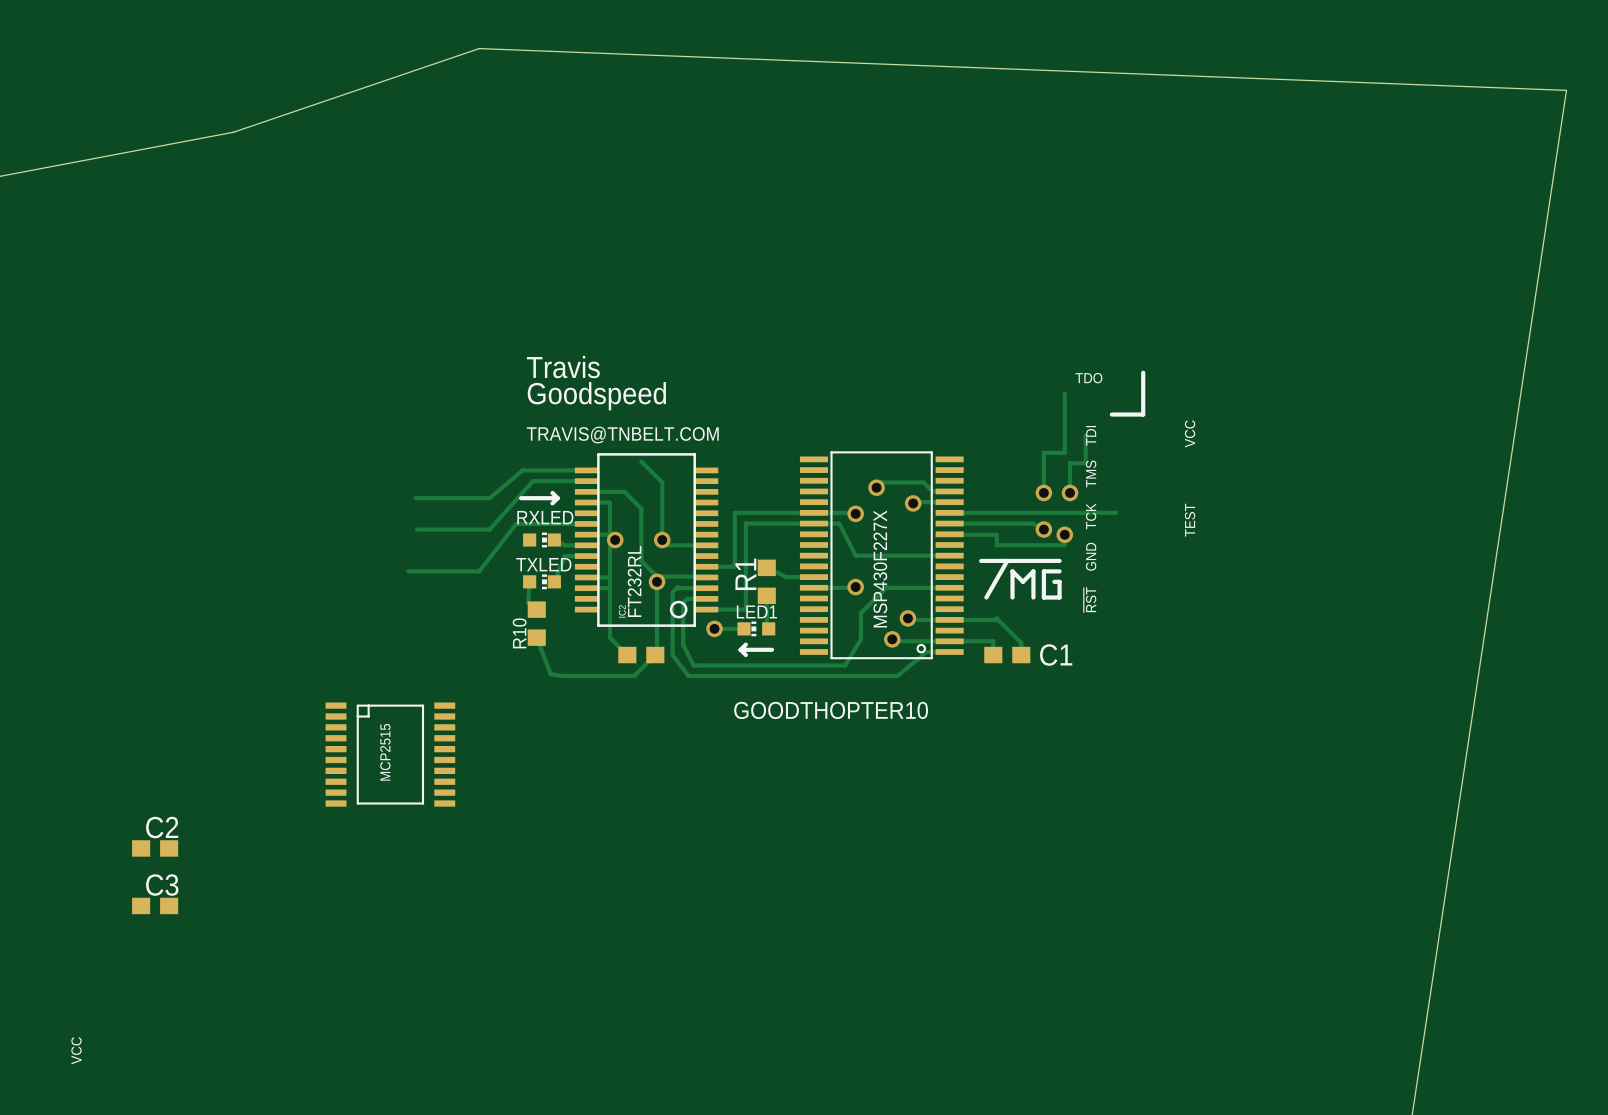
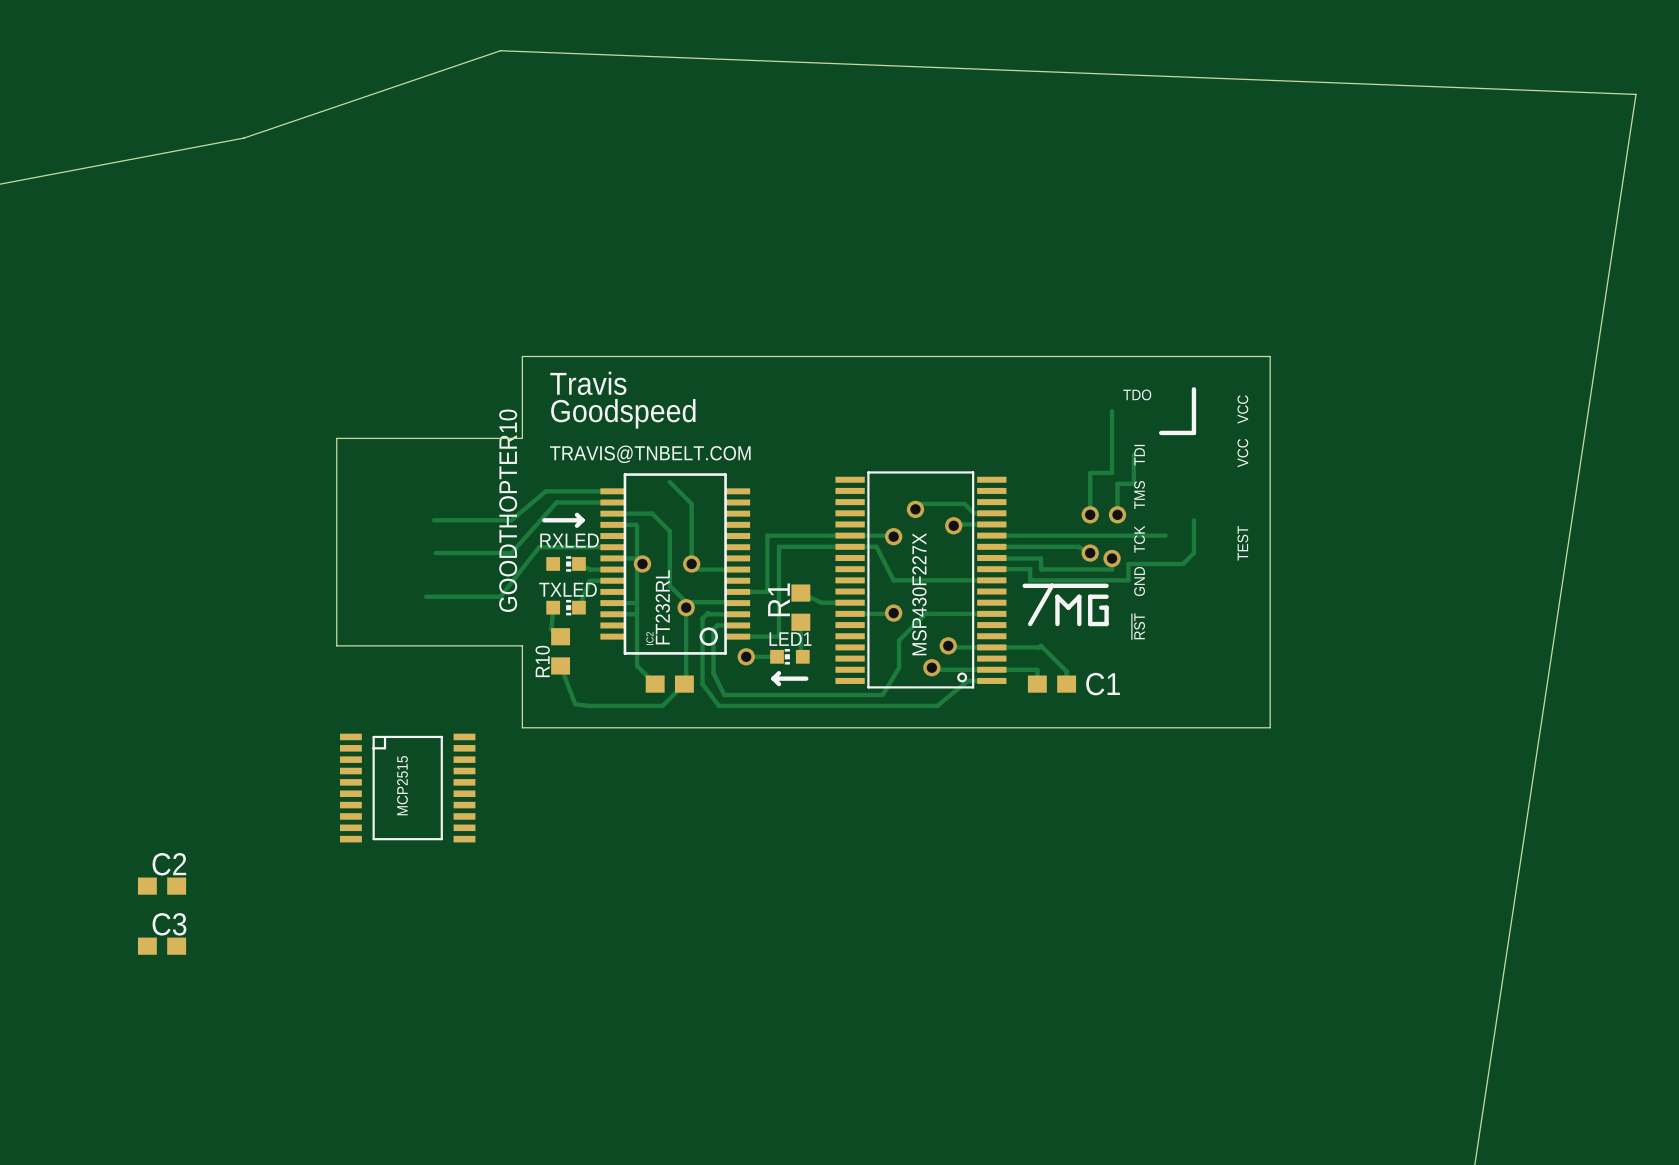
board edge: none -> (522, 356) (1270, 356) (1270, 727) (522, 727) (522, 645) (336, 645) (336, 438) (522, 438) (522, 356)
text: none -> VCC (1242, 409)
text: none -> GOODTHOPTER10 (508, 510)
track: none -> (1193, 520) (1193, 553) (1183, 563) (1128, 563) (1128, 580) (1030, 580) (1030, 569) (991, 569)
text: GOODTHOPTER10 (831, 710) -> none
text: VCC (76, 1050) -> none

